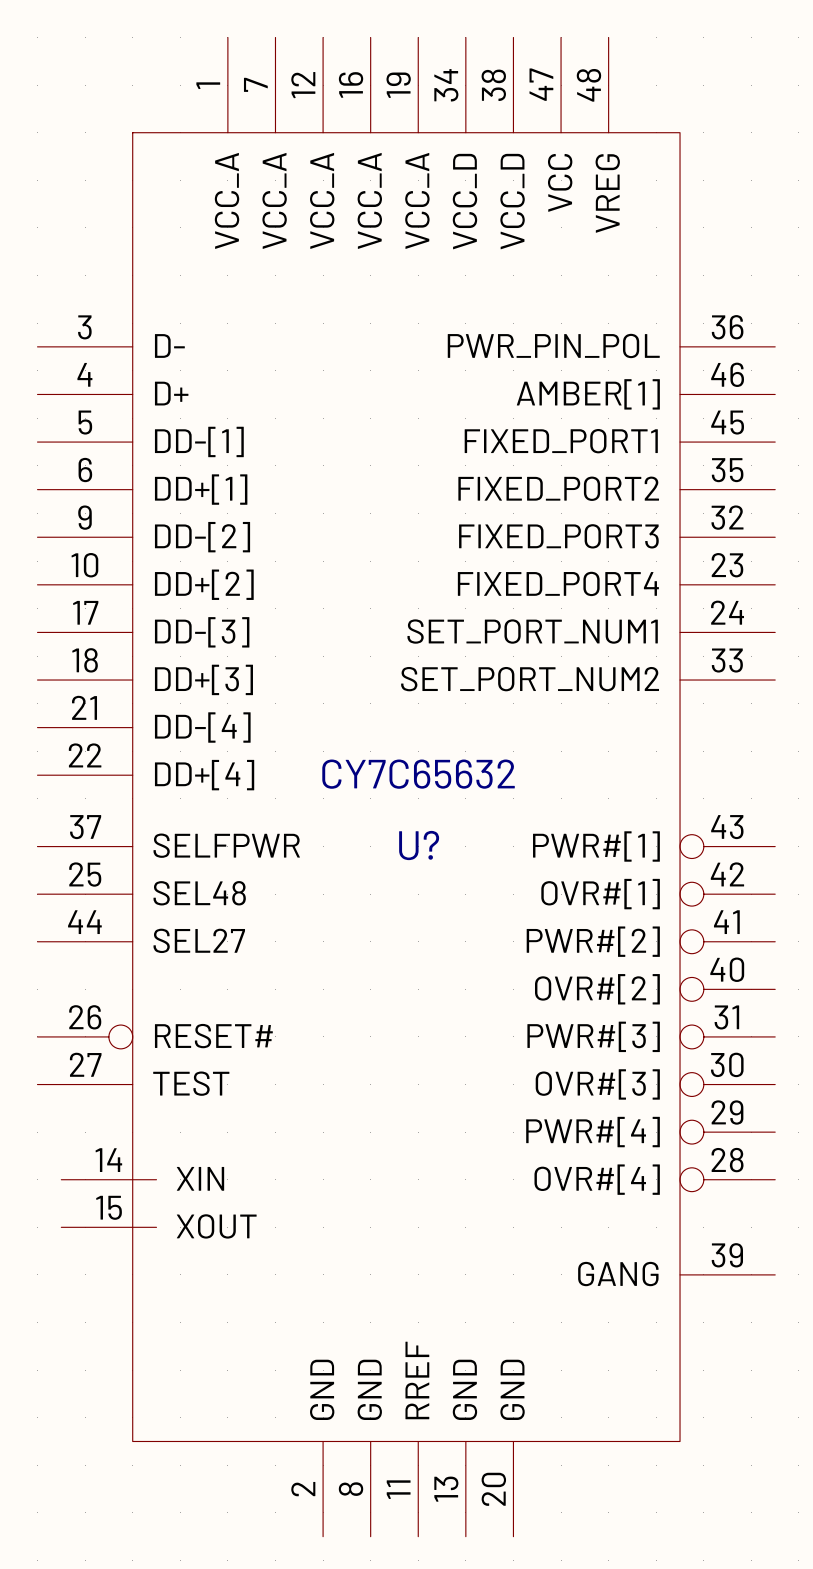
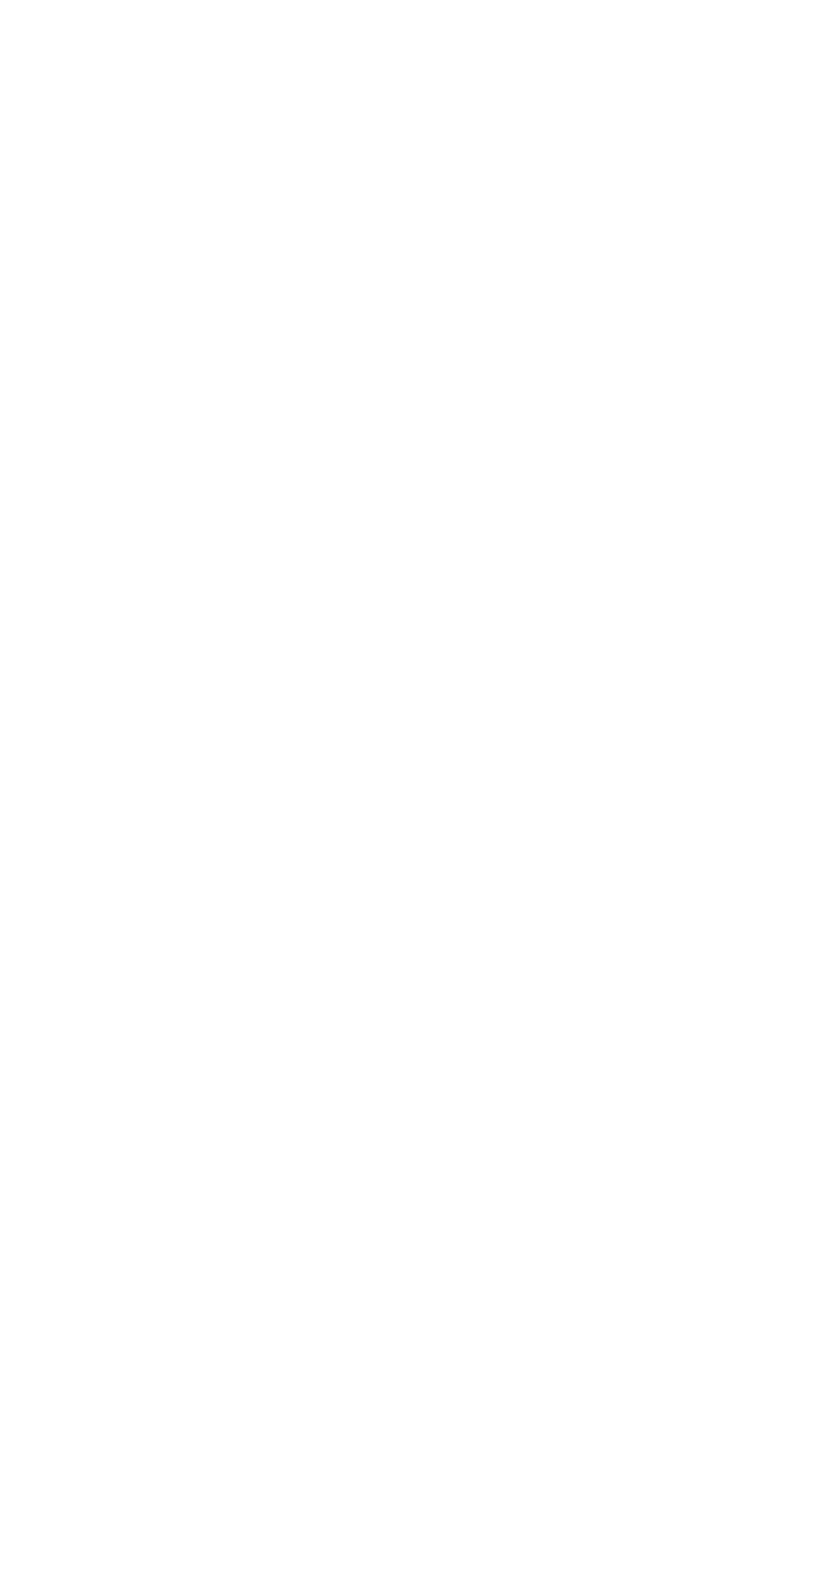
U?: CY7C65632 (406, 787) -> none

